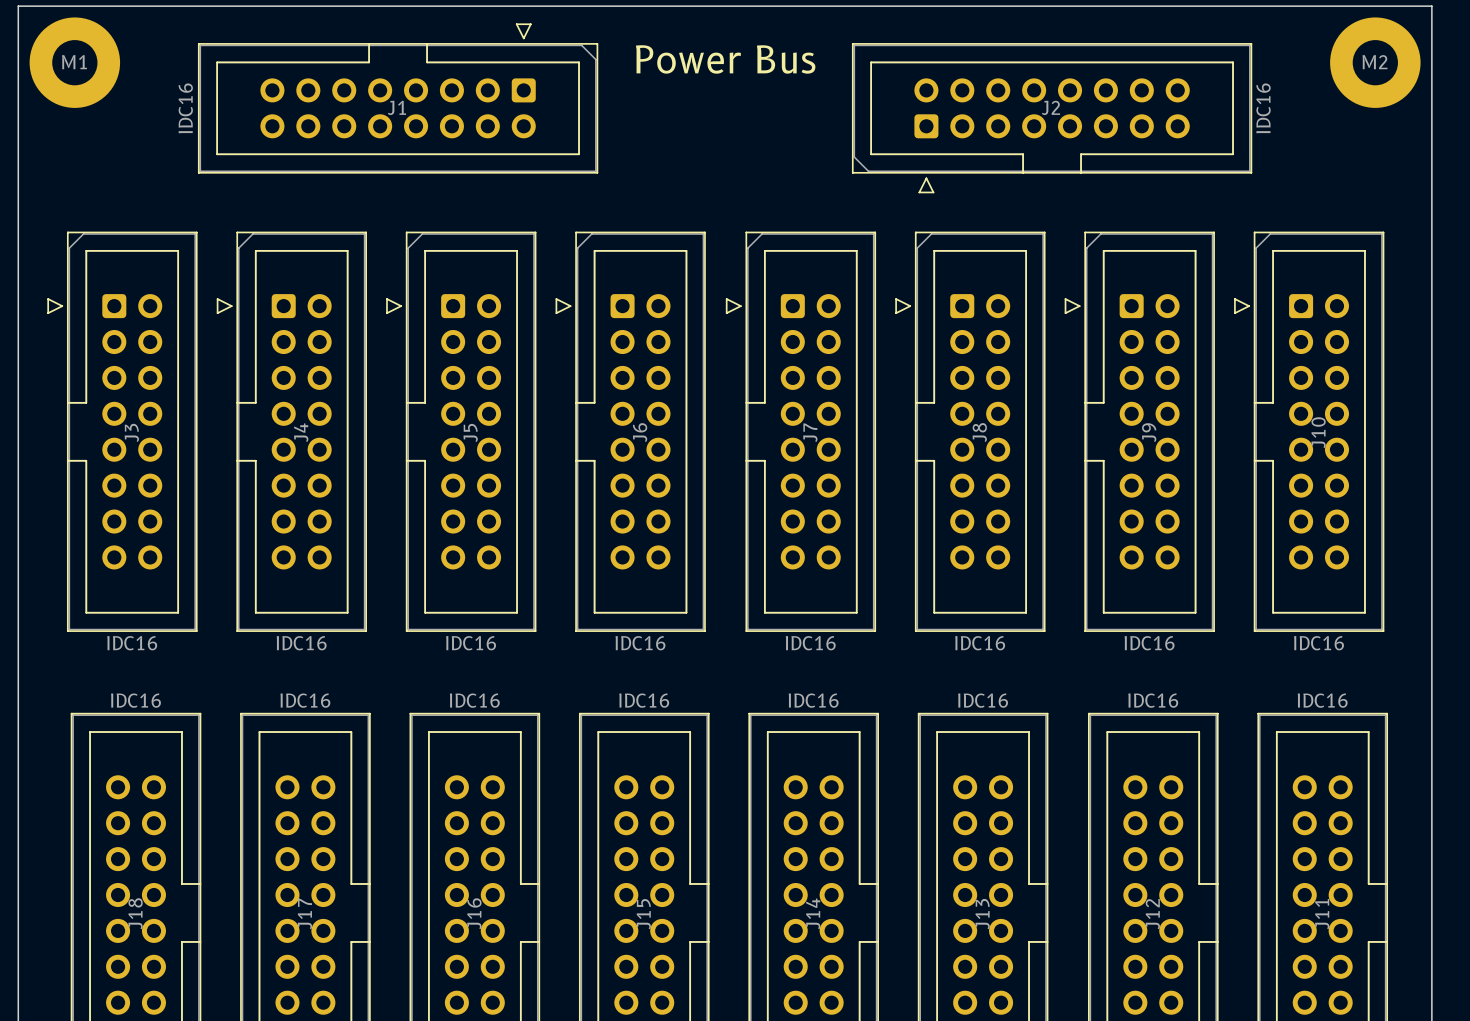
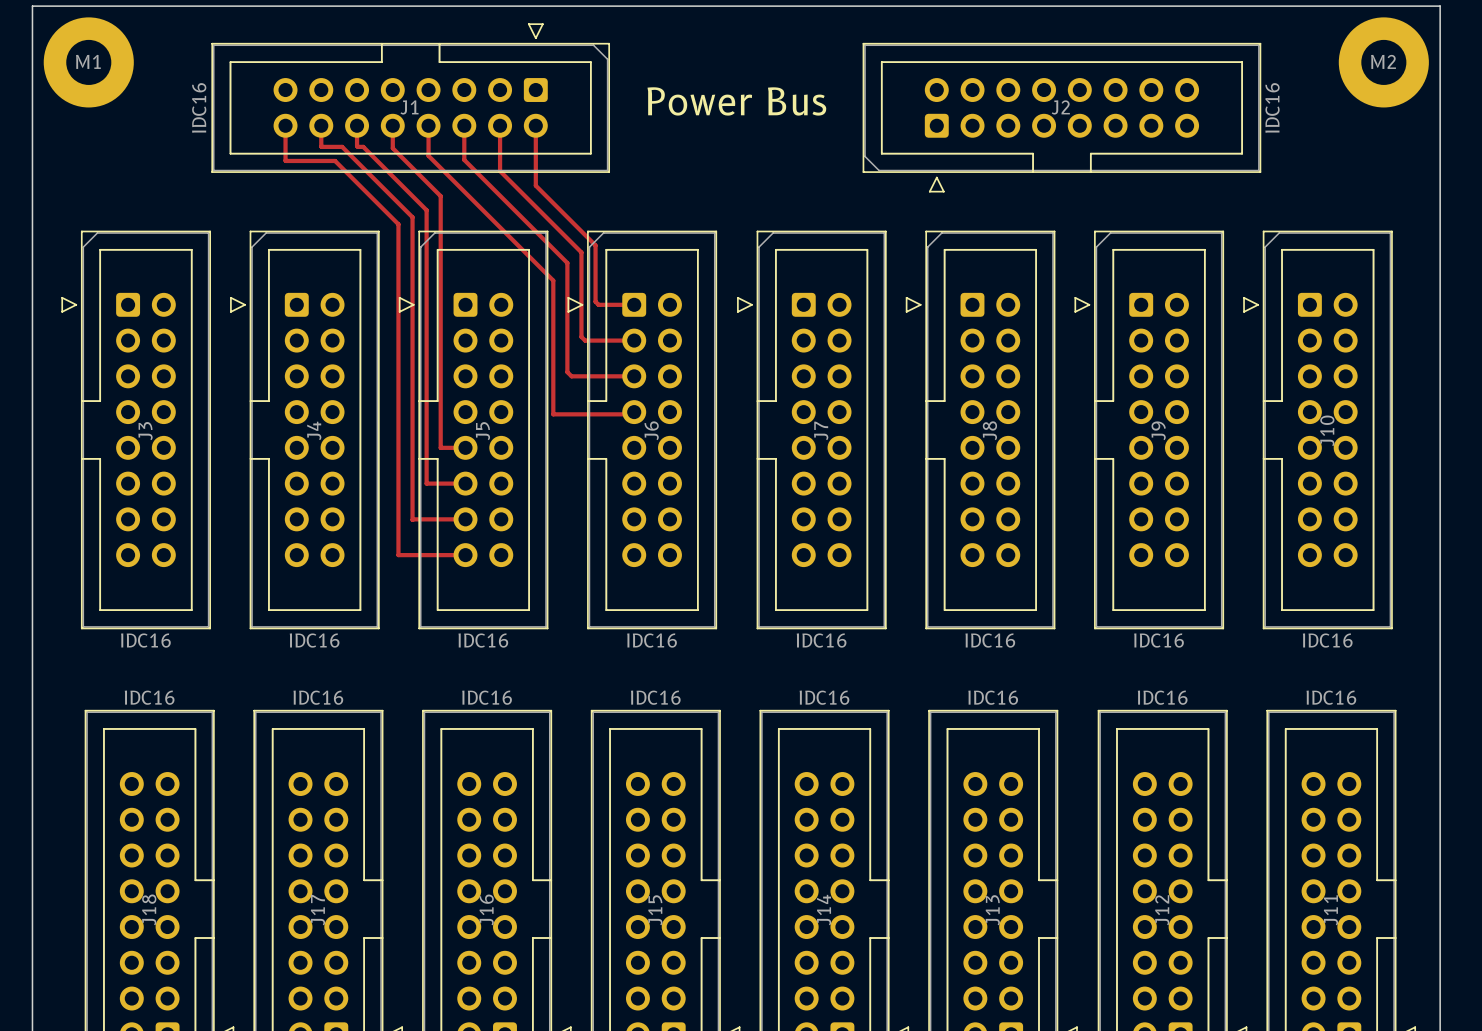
text position: Power Bus (725, 59) -> Power Bus (736, 101)
track: none -> (285, 125) (285, 160) (335, 160) (398, 224) (398, 555) (465, 555)
track: none -> (328, 125) (321, 125) (321, 146) (342, 146) (412, 217) (412, 519) (465, 519)
track: none -> (357, 125) (357, 146) (363, 146) (426, 210) (426, 483) (465, 483)
track: none -> (392, 125) (392, 148) (440, 196) (440, 447) (465, 447)
track: none -> (428, 125) (428, 155) (553, 280) (553, 414) (631, 414) (634, 412)
track: none -> (464, 125) (464, 159) (567, 263) (567, 372) (571, 376) (634, 376)
track: none -> (500, 125) (500, 171) (581, 252) (581, 336) (585, 340) (634, 340)
track: none -> (535, 125) (535, 185) (595, 245) (595, 301) (598, 304) (634, 304)

